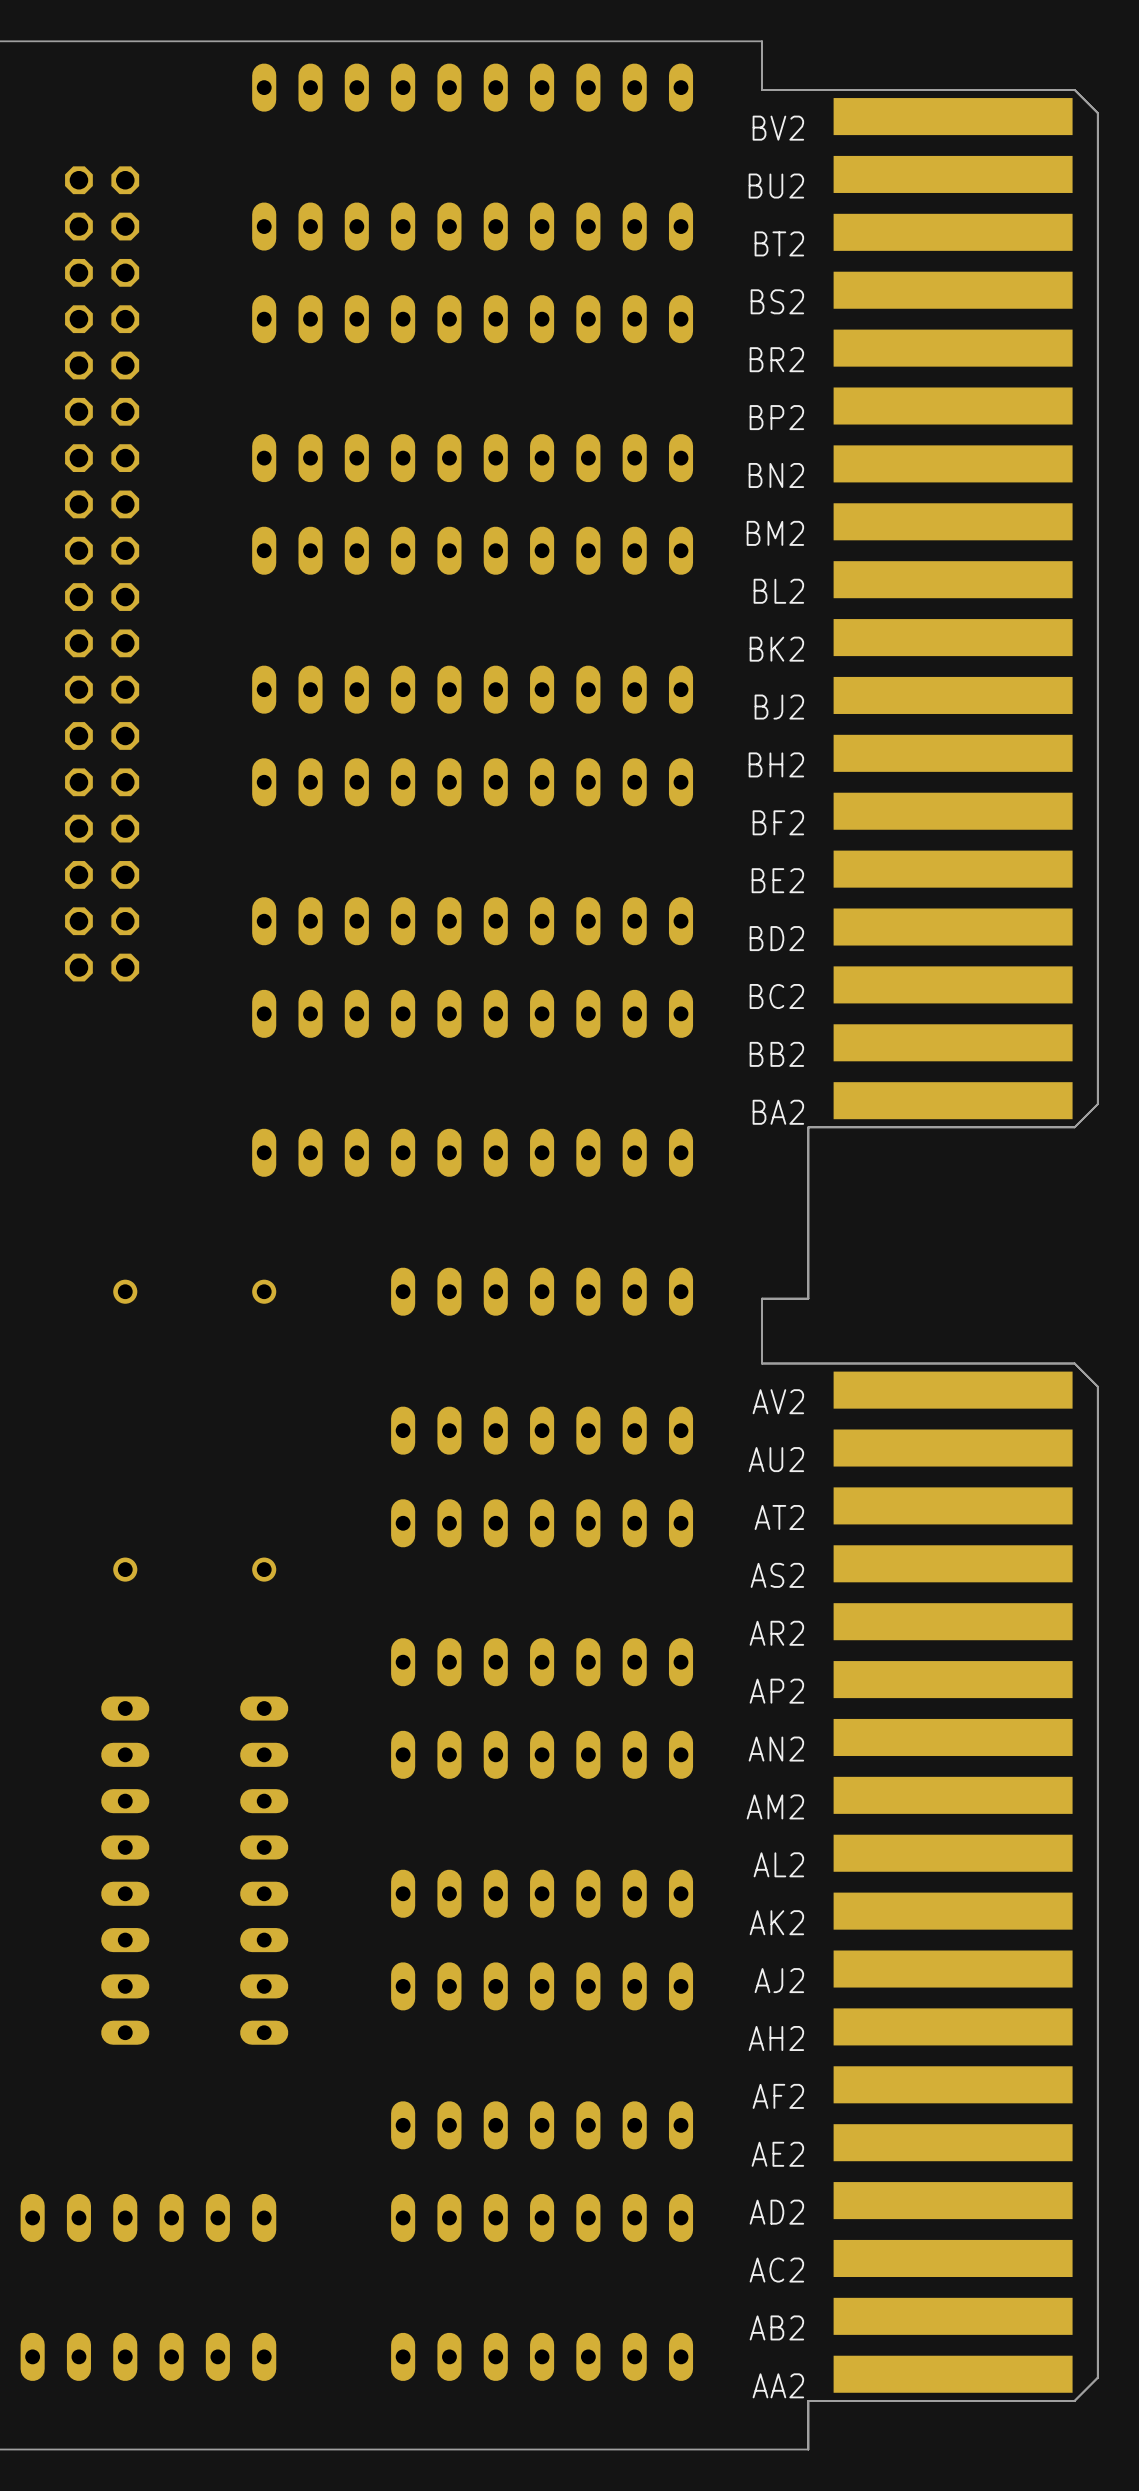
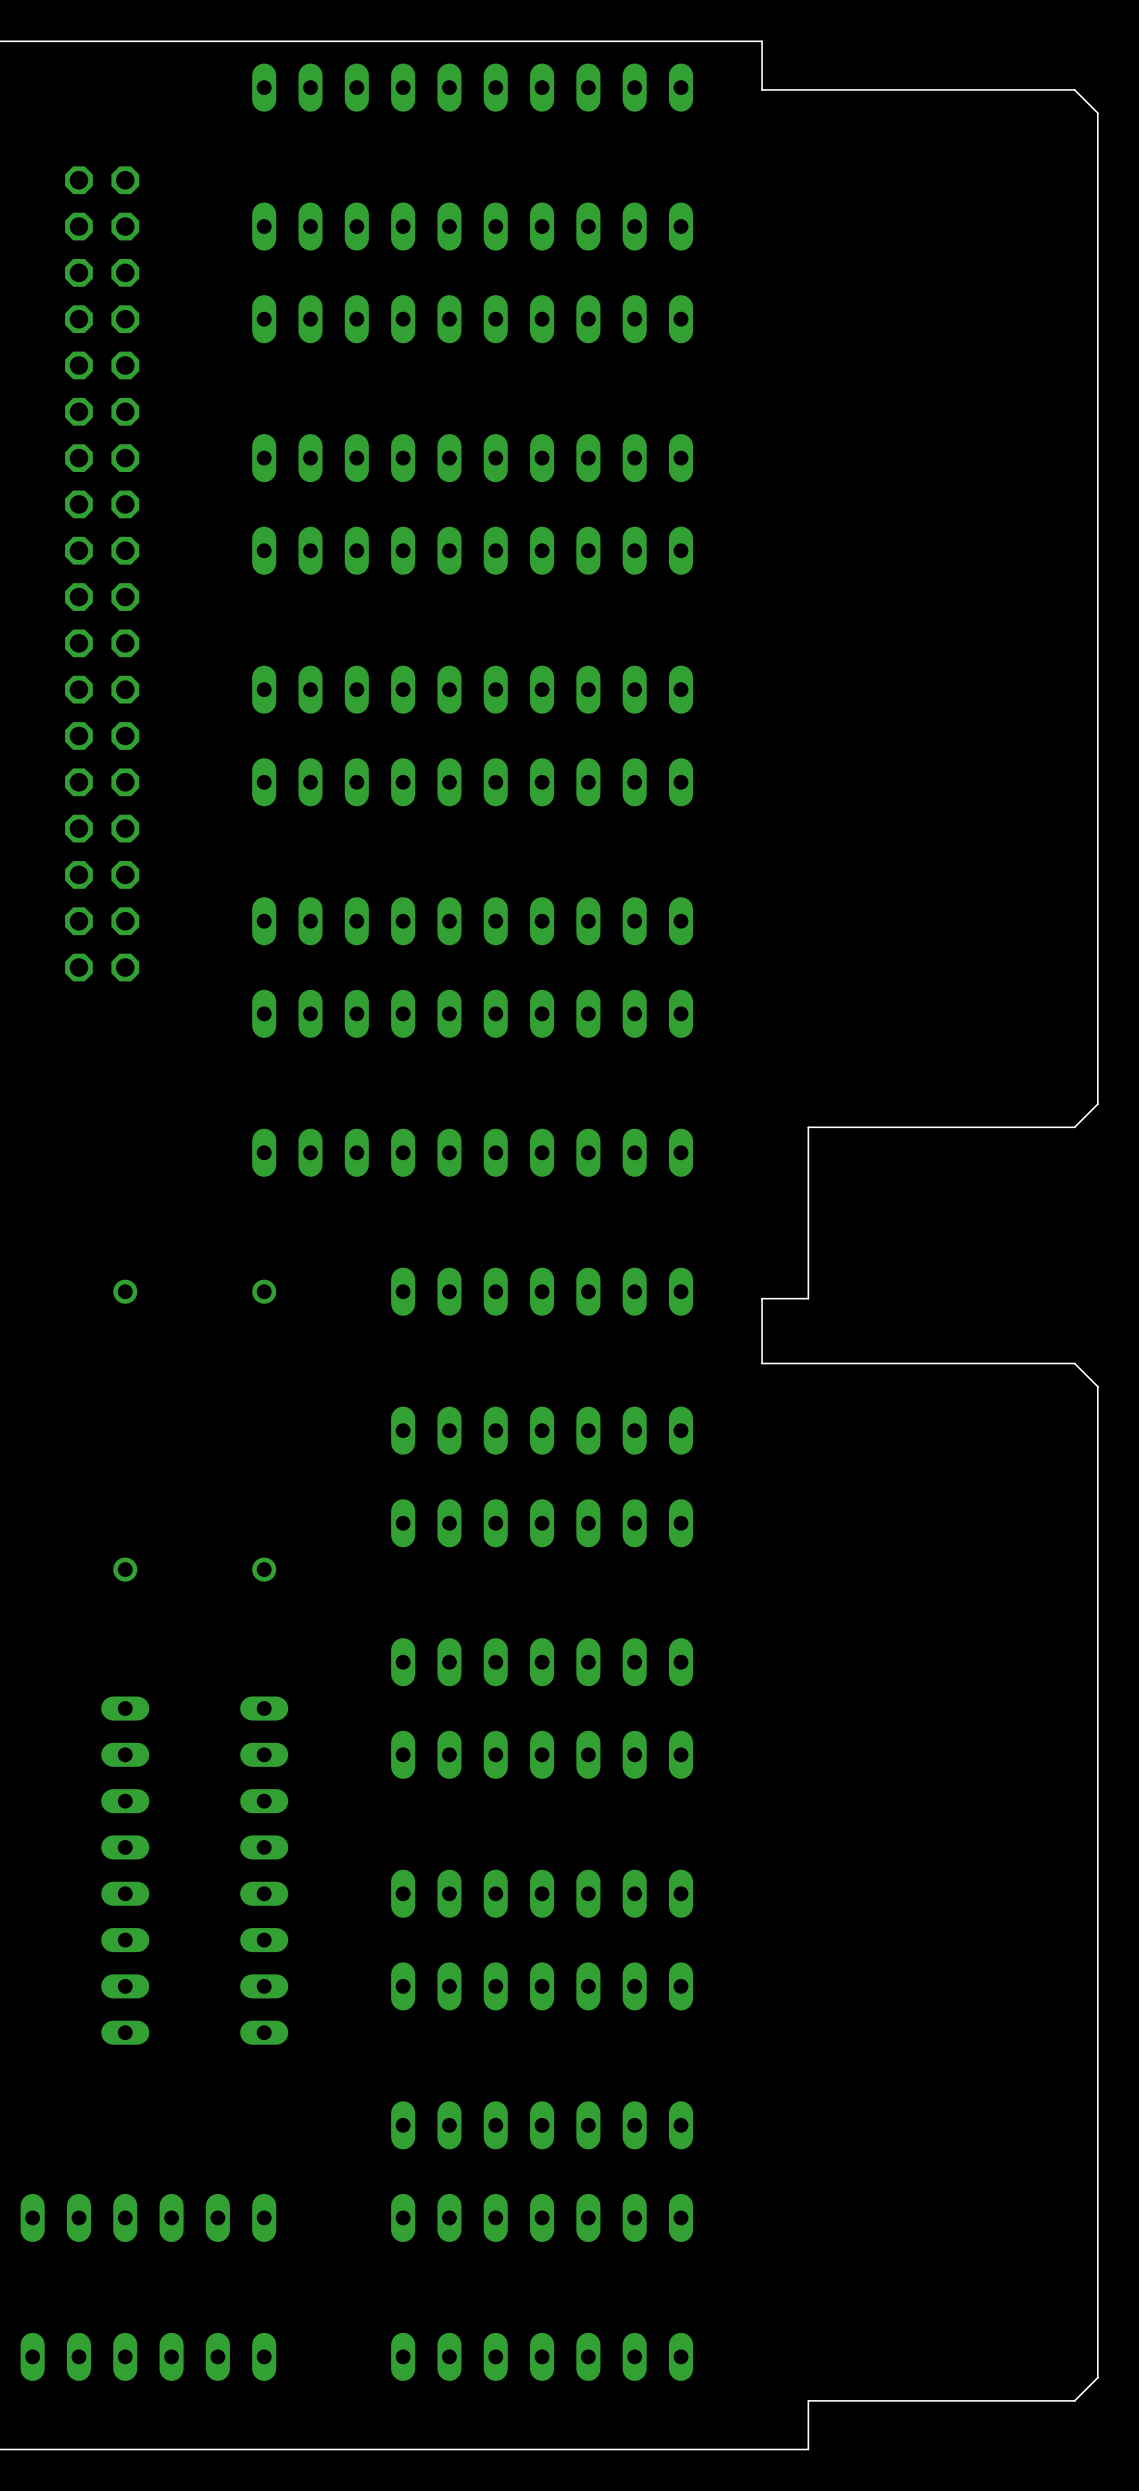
part: (929, 1246) -> none

